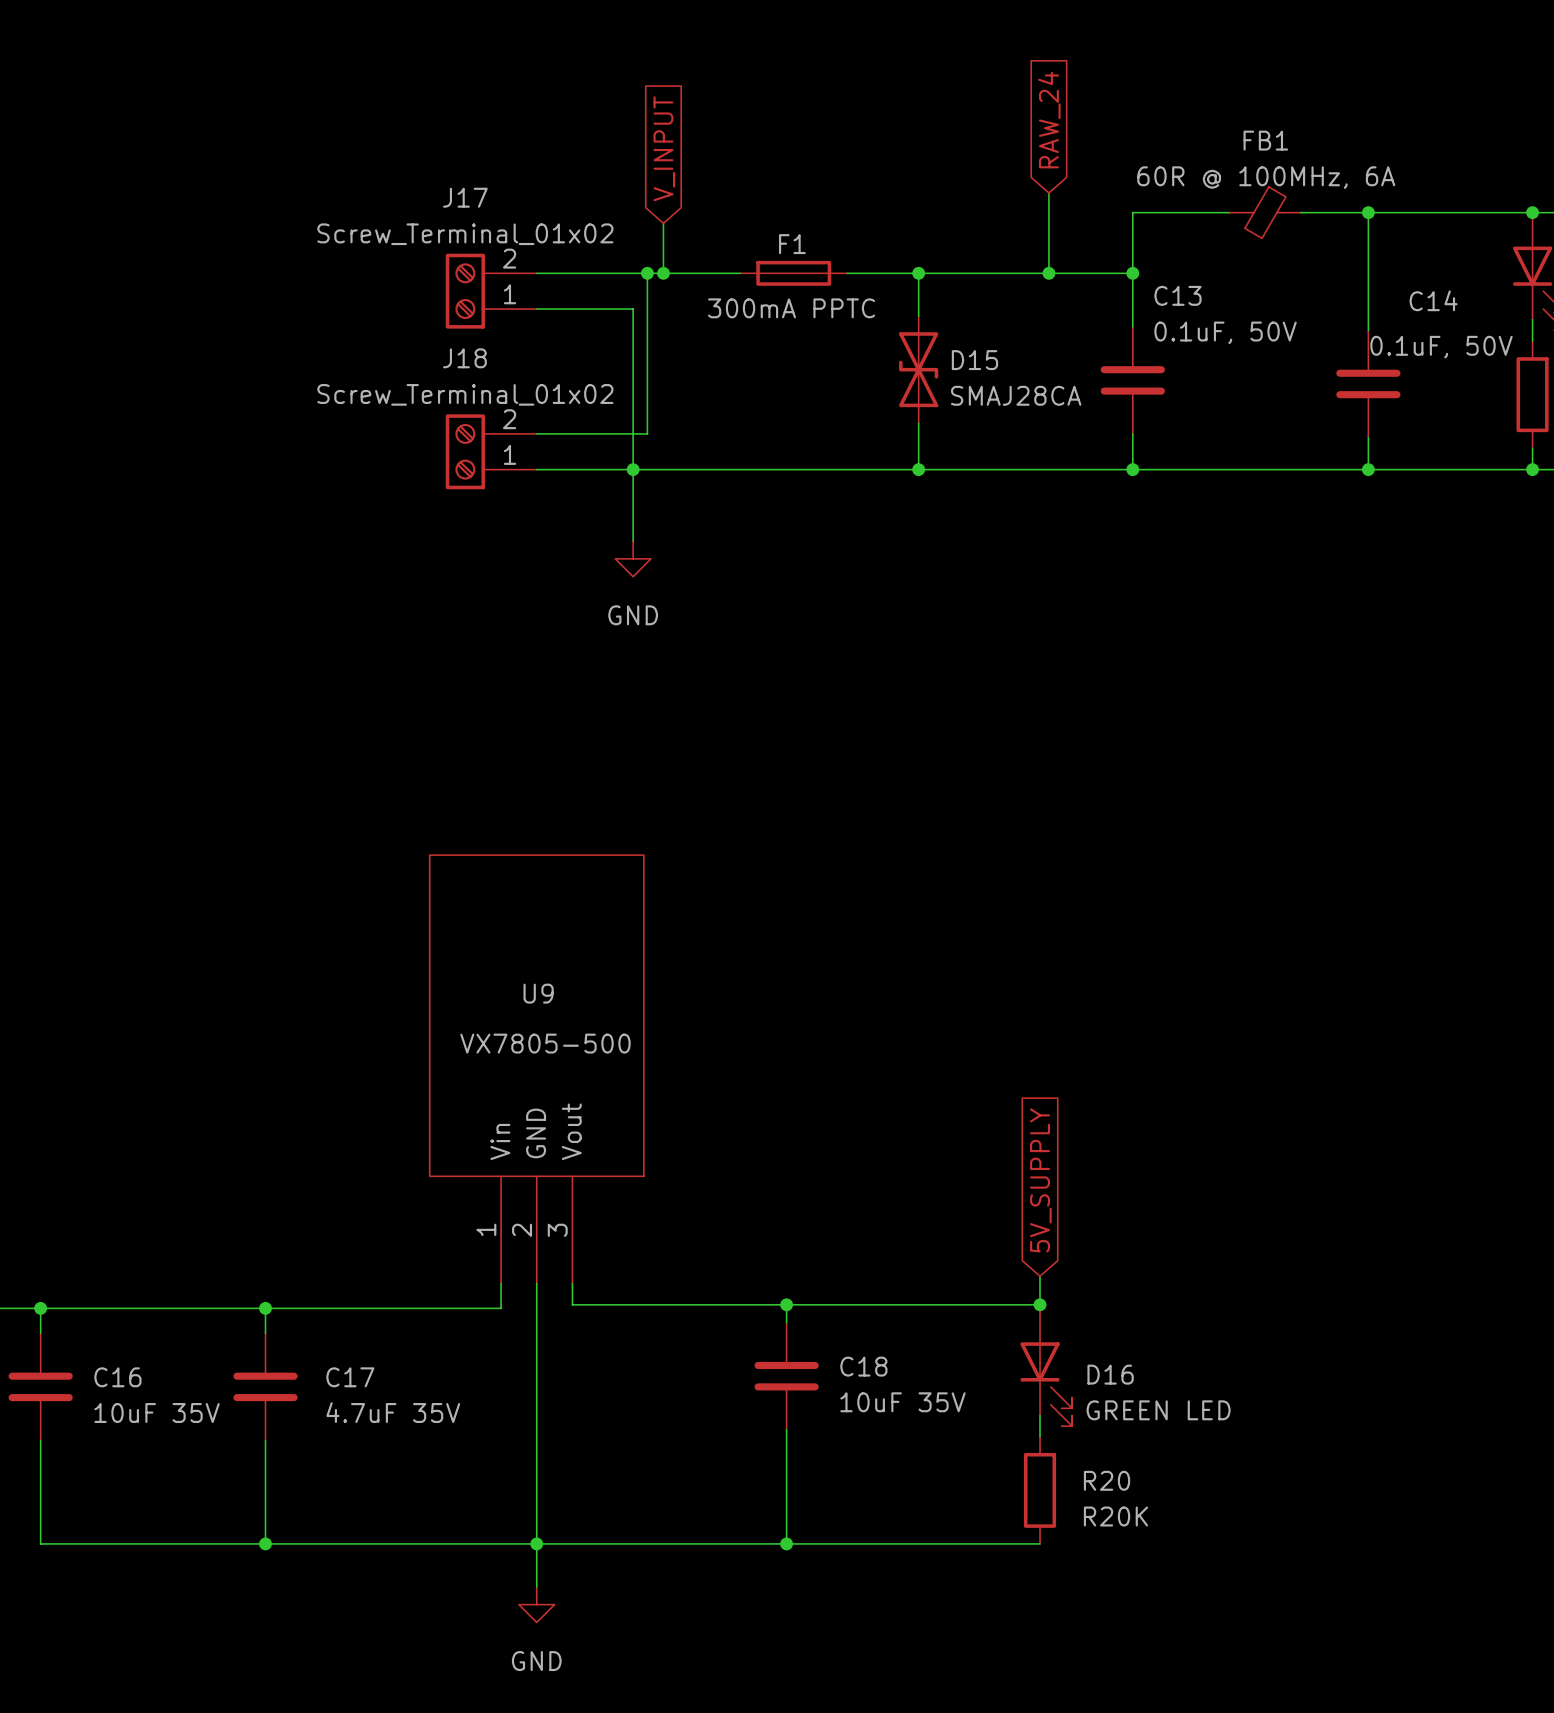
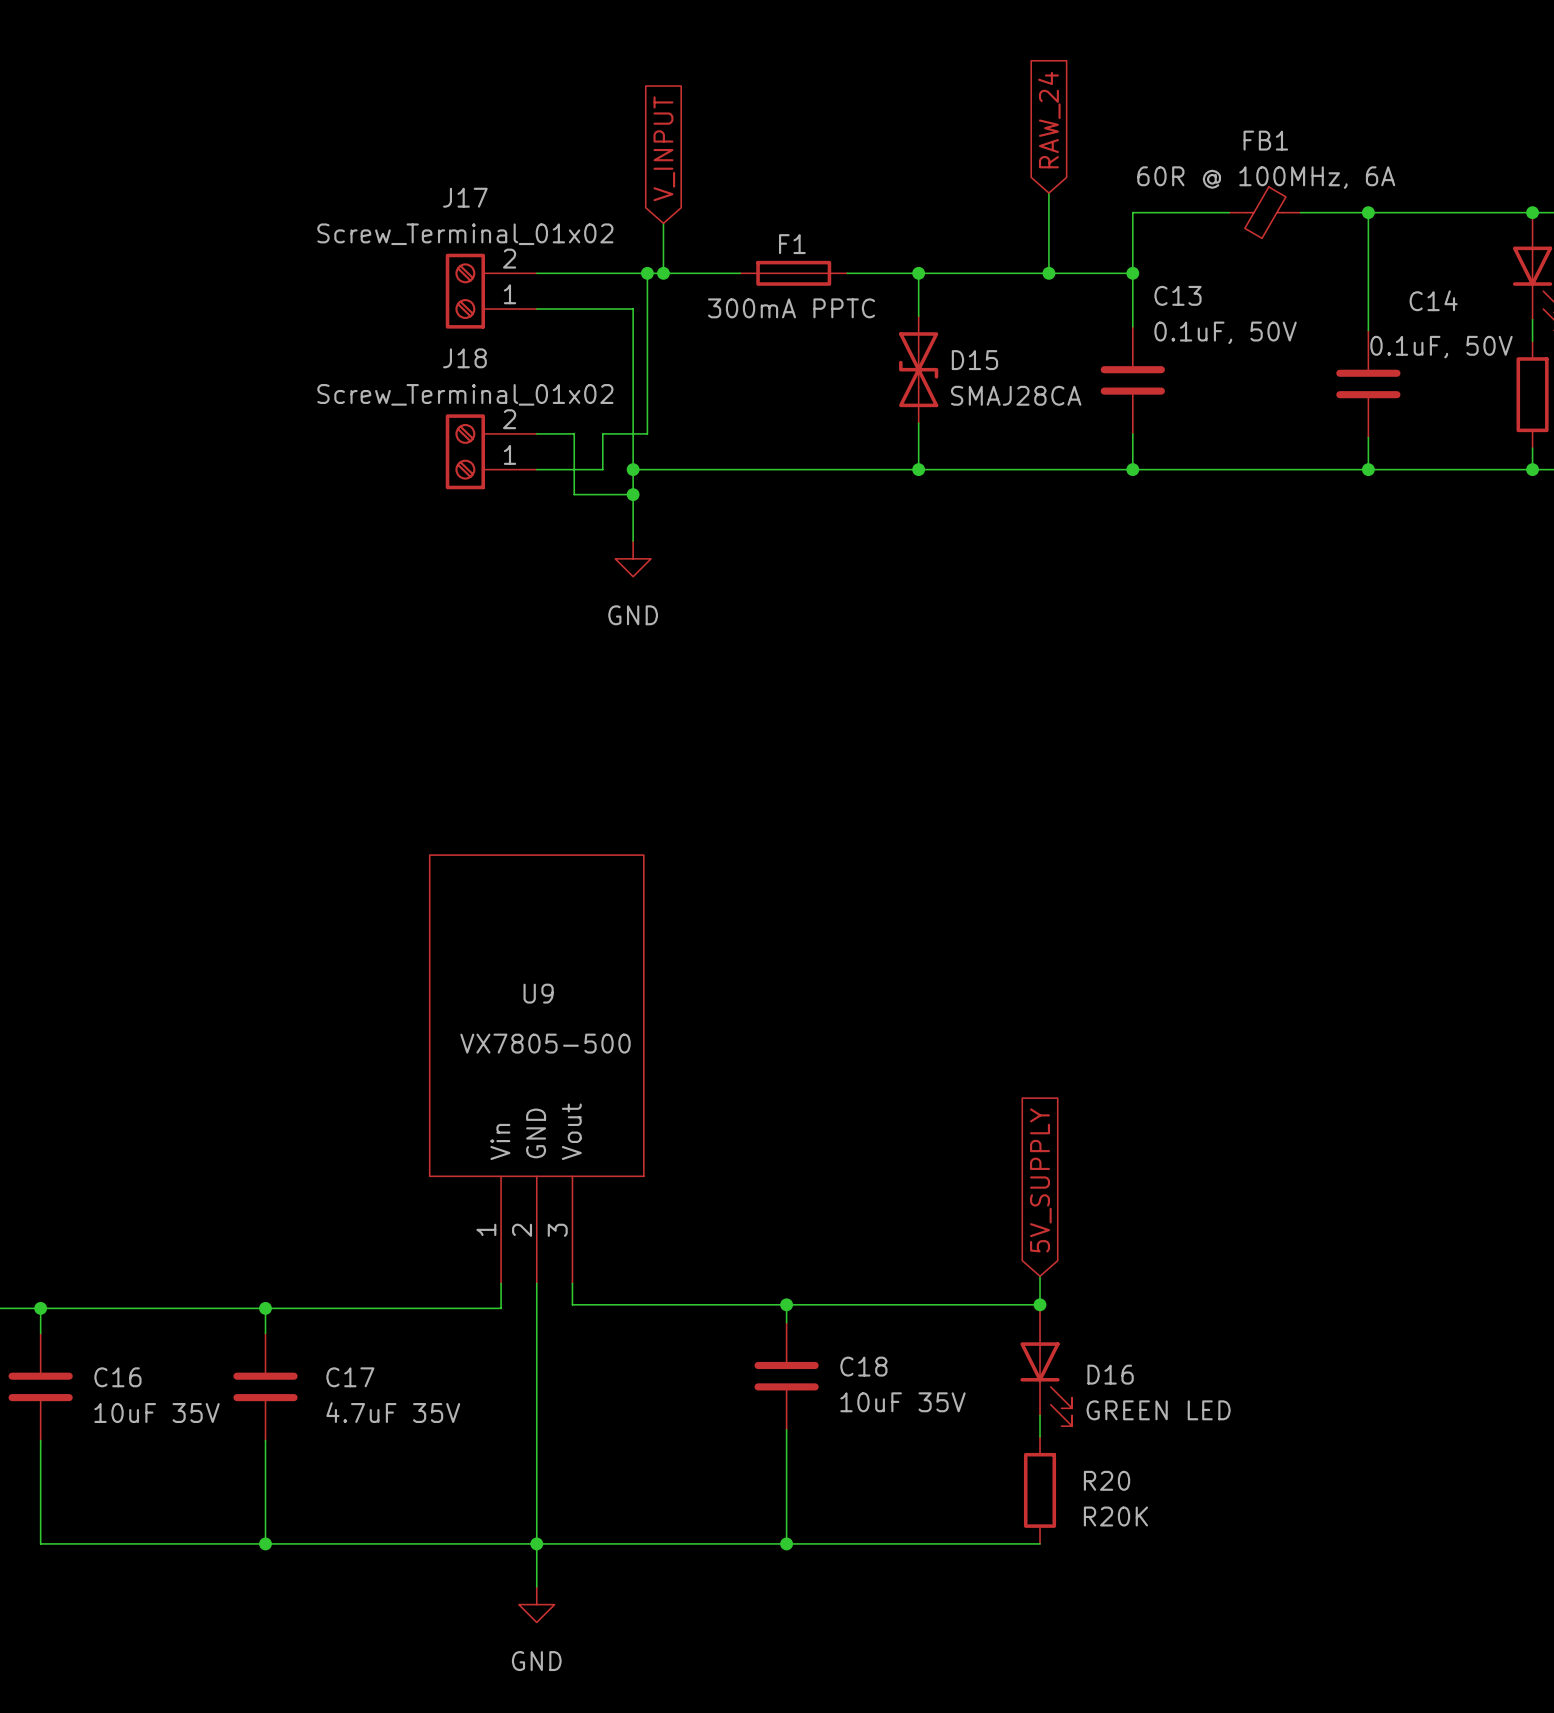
wire: (574, 433) (602, 433) -> (602, 469) (602, 433)
wire: none -> (574, 433) (574, 494) (633, 494)
wire: (602, 469) (633, 469) -> none
junction: none -> (633, 494)

